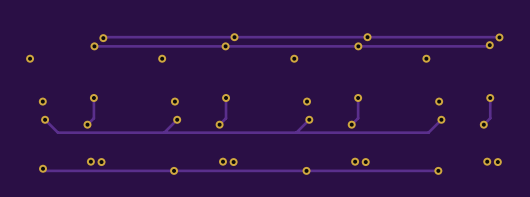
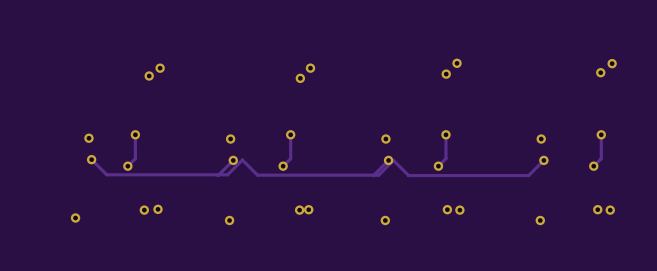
via: (234, 37) -> none
track: (499, 37) (103, 38) -> none
via: (103, 38) -> none
via: none -> (160, 68)
via: none -> (310, 68)
track: (489, 45) (94, 46) -> none
via: (94, 46) -> none
via: (225, 46) -> none
via: none -> (149, 75)
via: none -> (300, 78)
via: (30, 58) -> none
via: (162, 58) -> none
via: (294, 58) -> none
via: (426, 58) -> none
via: none -> (88, 138)
via: (42, 101) -> none
track: (45, 119) (57, 132) (326, 132) -> (91, 159) (106, 174) (227, 174) (242, 160) (257, 175) (378, 175) (393, 160) (408, 175)
via: (45, 119) -> none
via: none -> (91, 159)
via position: (90, 161) -> (157, 209)
via position: (223, 161) -> (308, 209)
via: (355, 161) -> none
via: none -> (447, 209)
via: (365, 162) -> none
via: none -> (459, 210)
track: (43, 168) (45, 170) (438, 170) -> none

